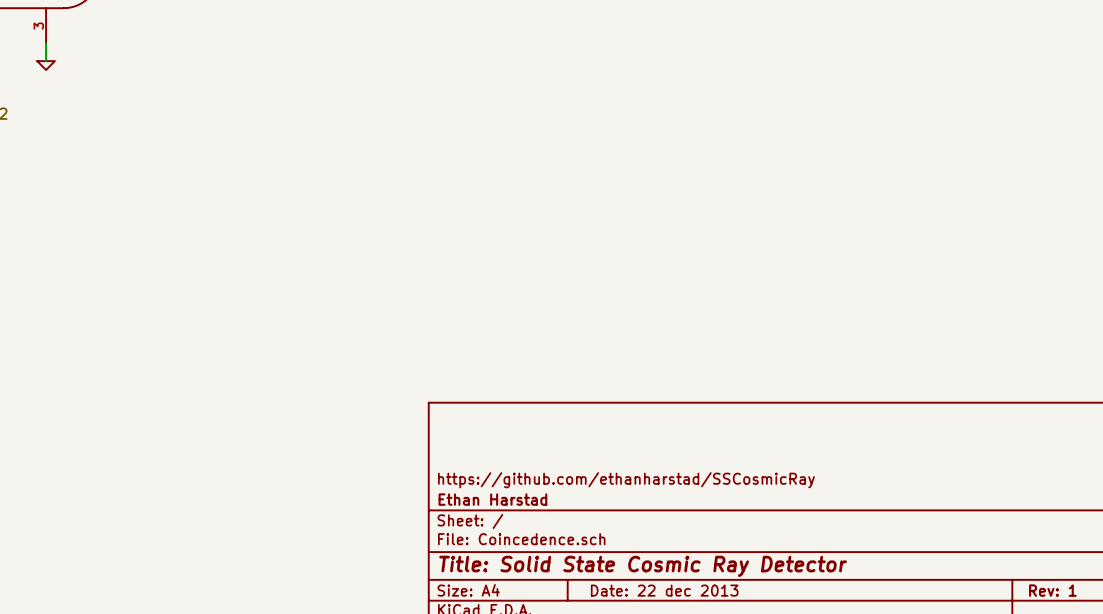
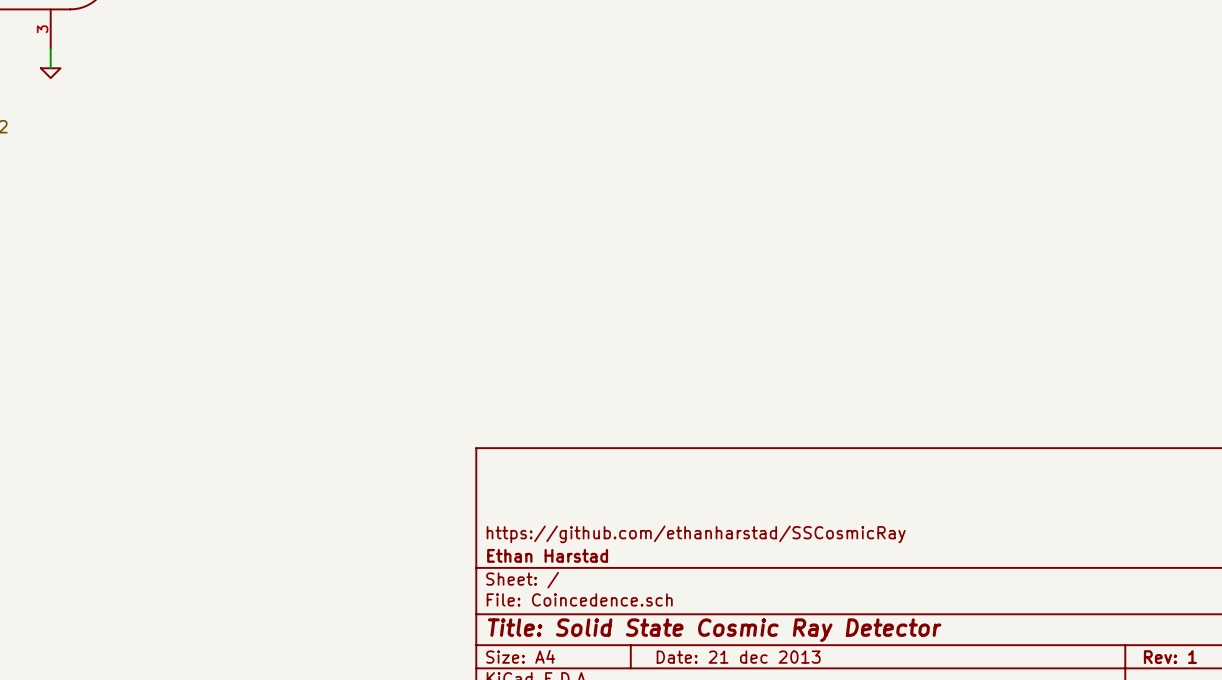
title block: Date: 22 dec 2013 (664, 590) -> Date: 21 dec 2013 (738, 657)

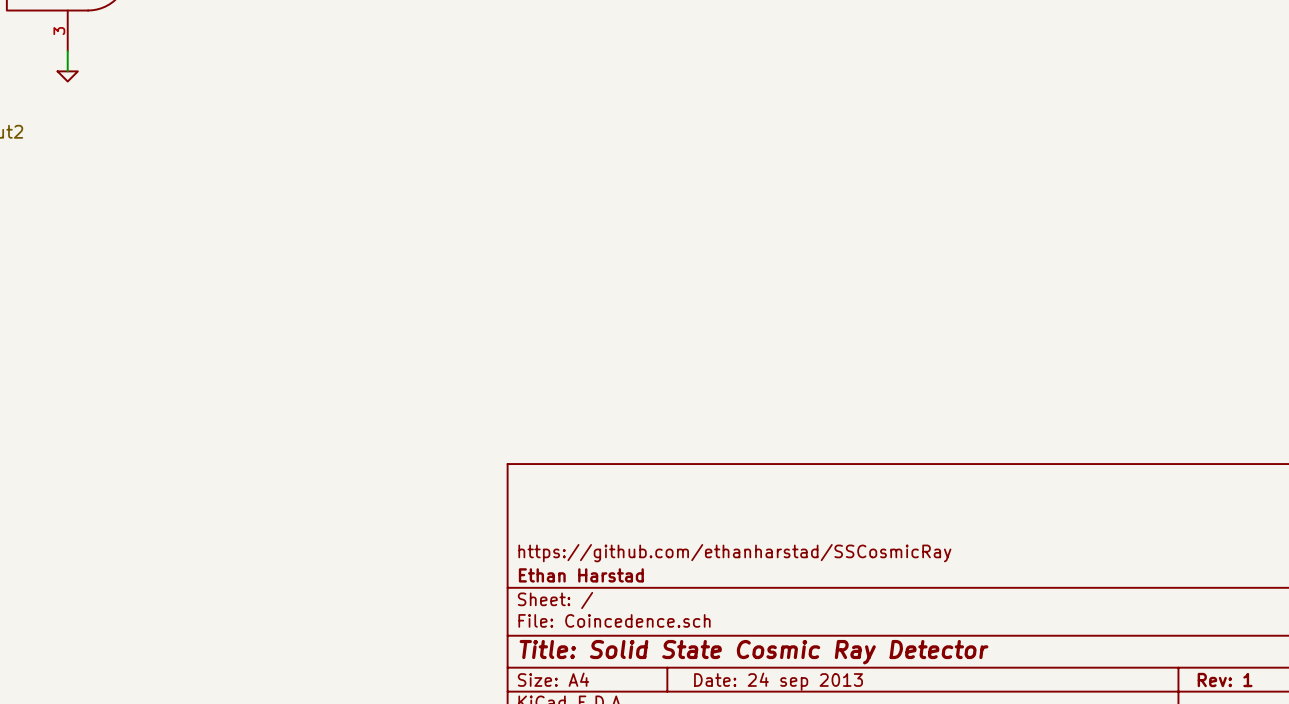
title block: Date: 21 dec 2013 (738, 657) -> Date: 24 sep 2013 (778, 681)

